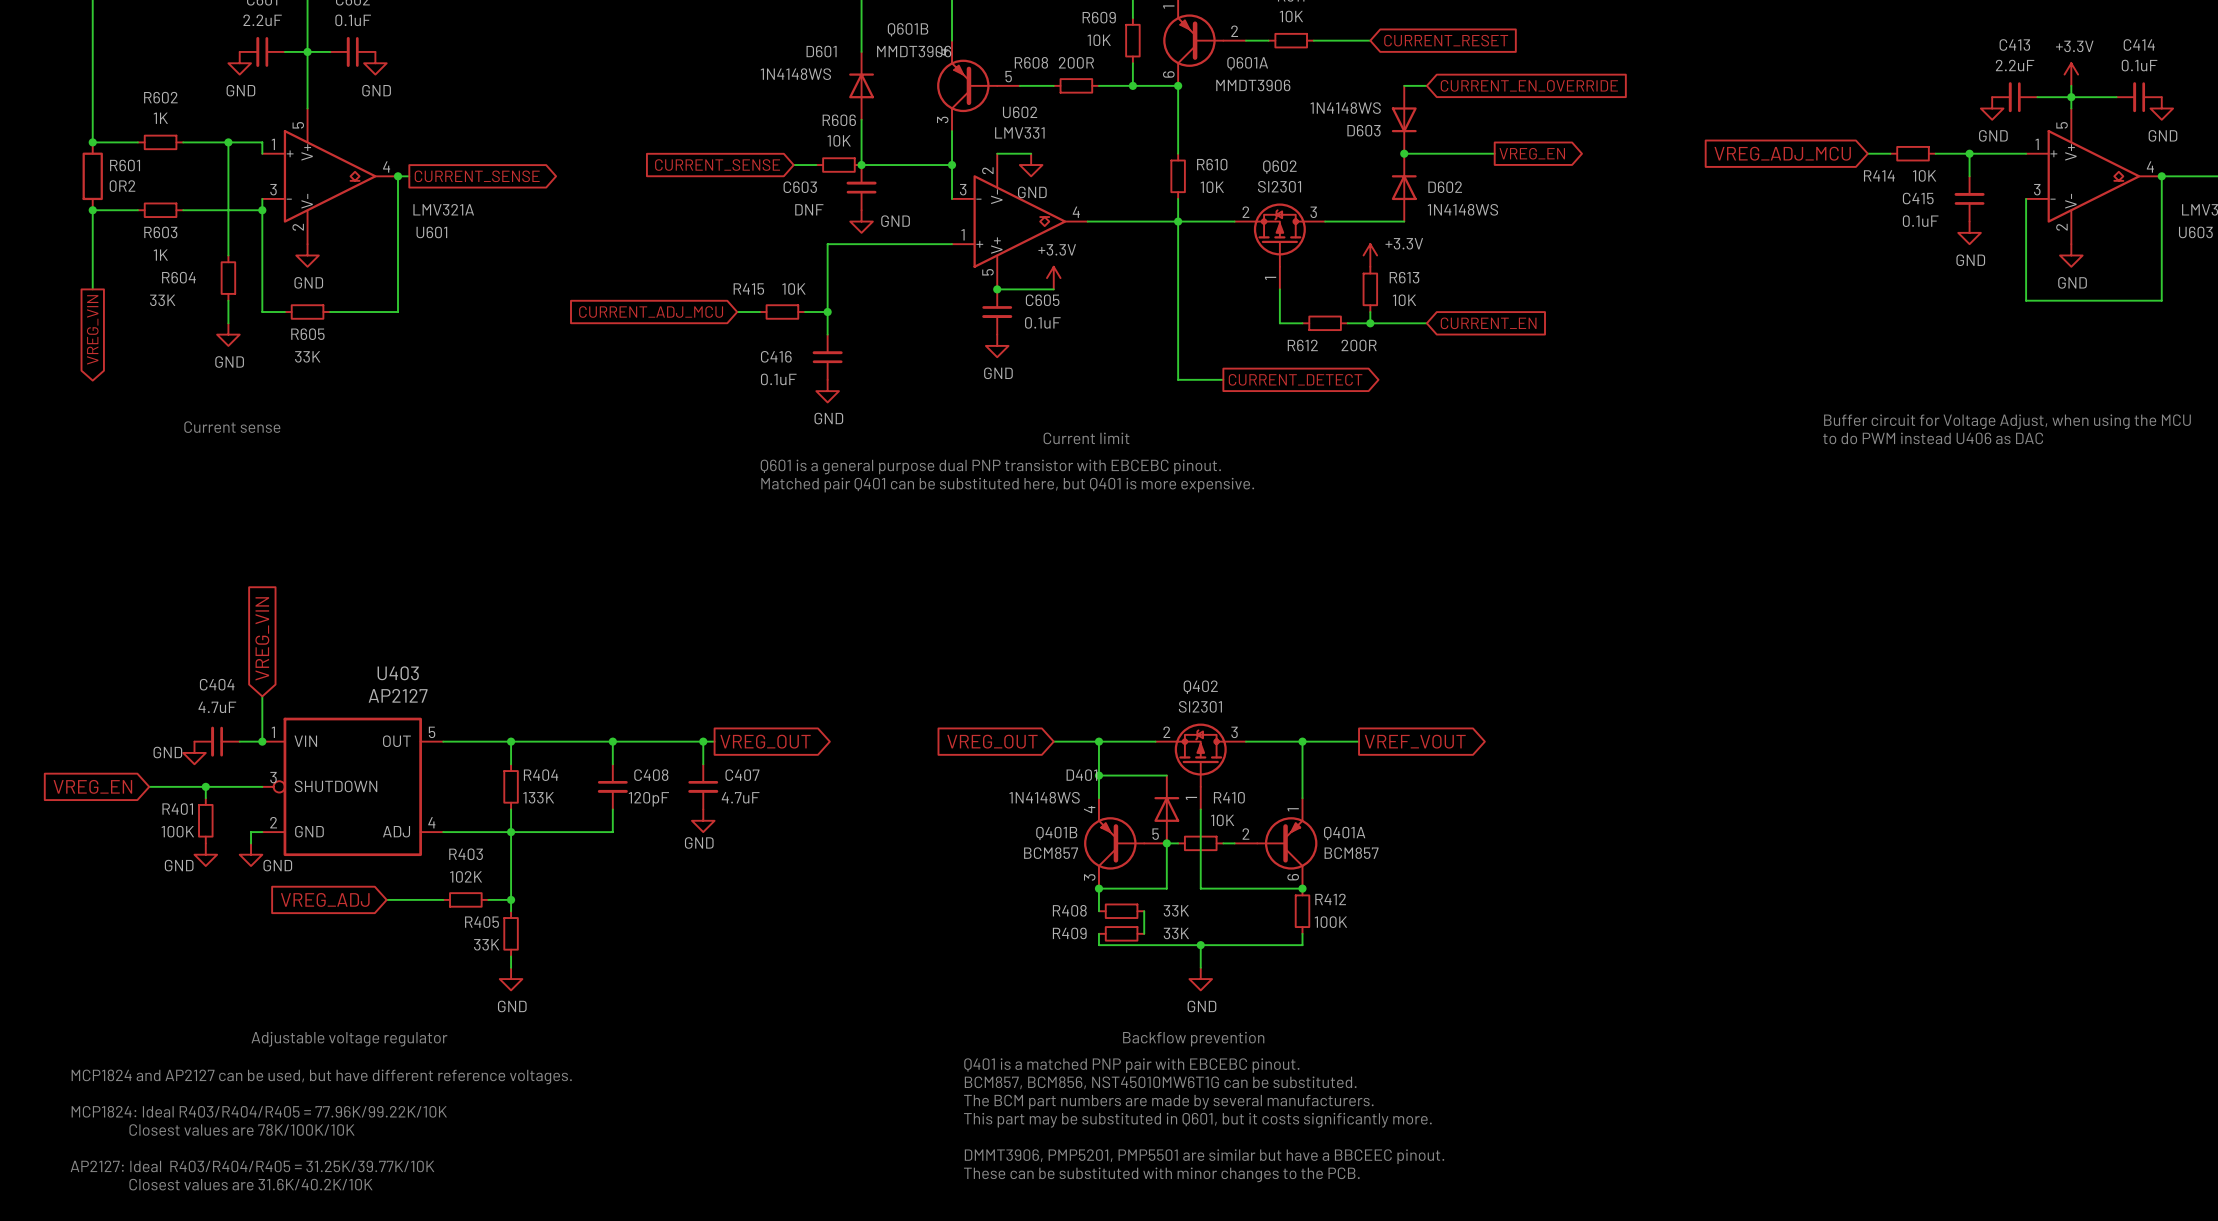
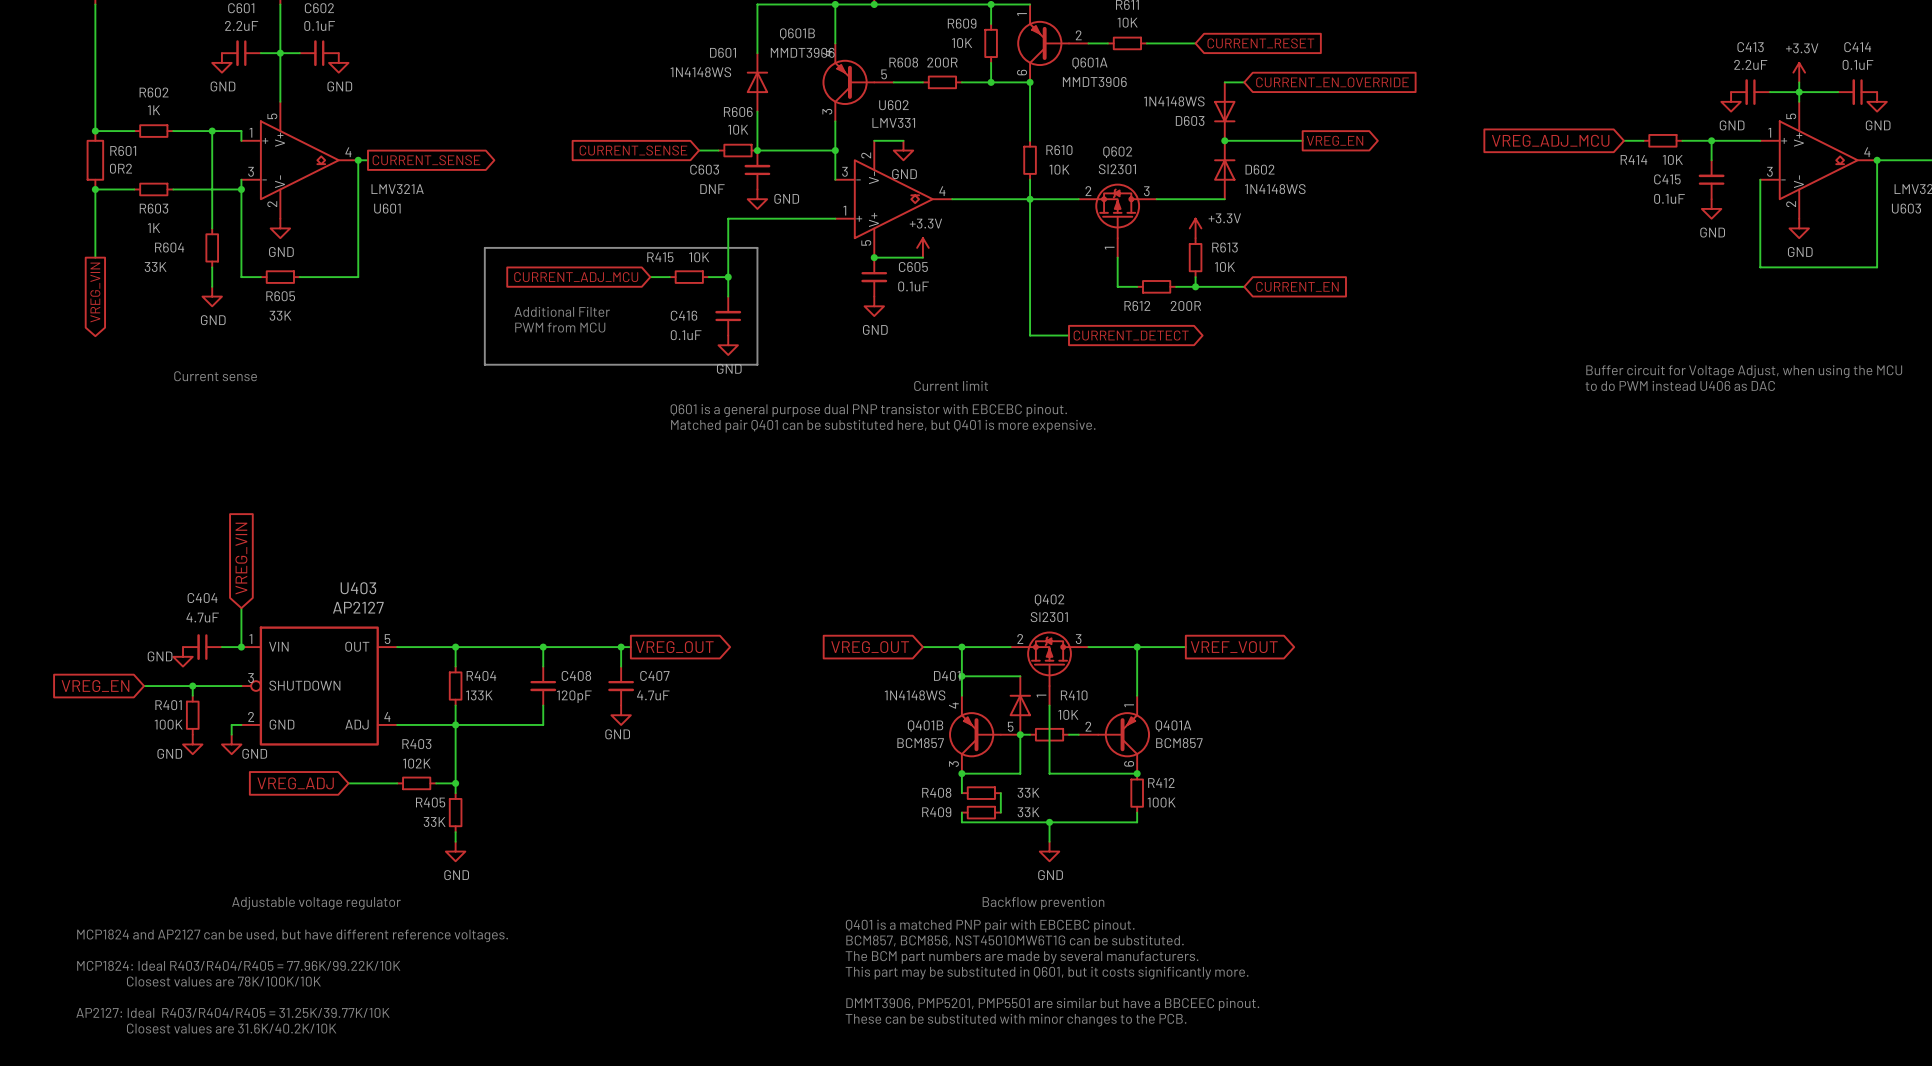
line: none -> (484, 247) (757, 247) (757, 364) (484, 364) (484, 247)
text: none -> Additional Filter (562, 311)
text: none -> PWM from MCU (560, 327)

